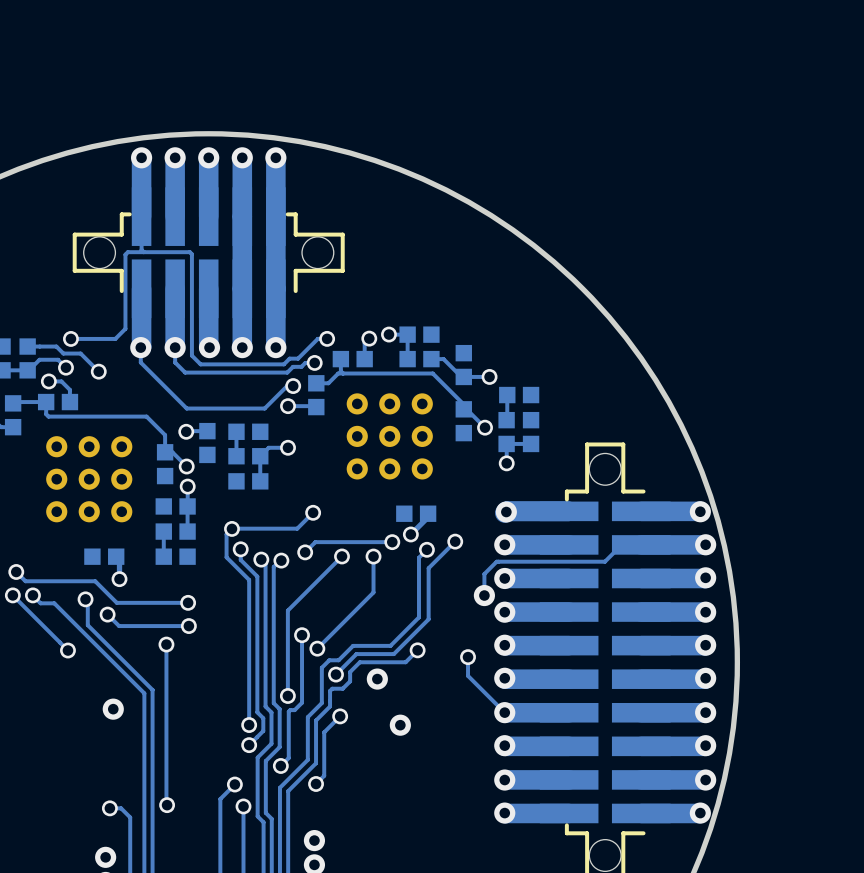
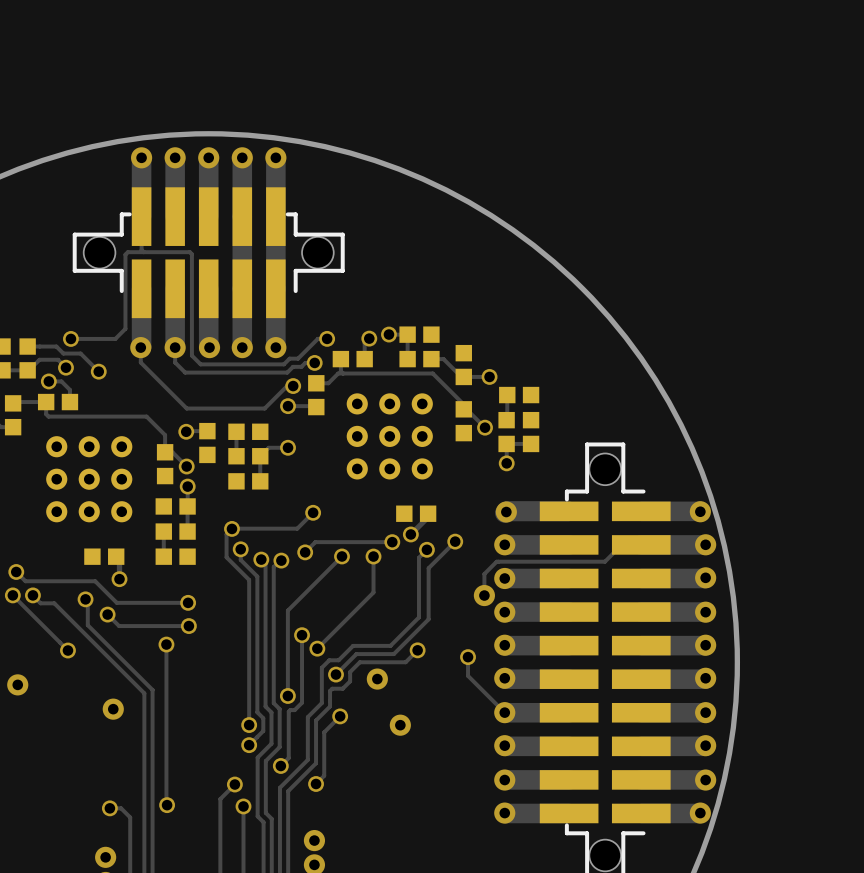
via: none -> (17, 684)

